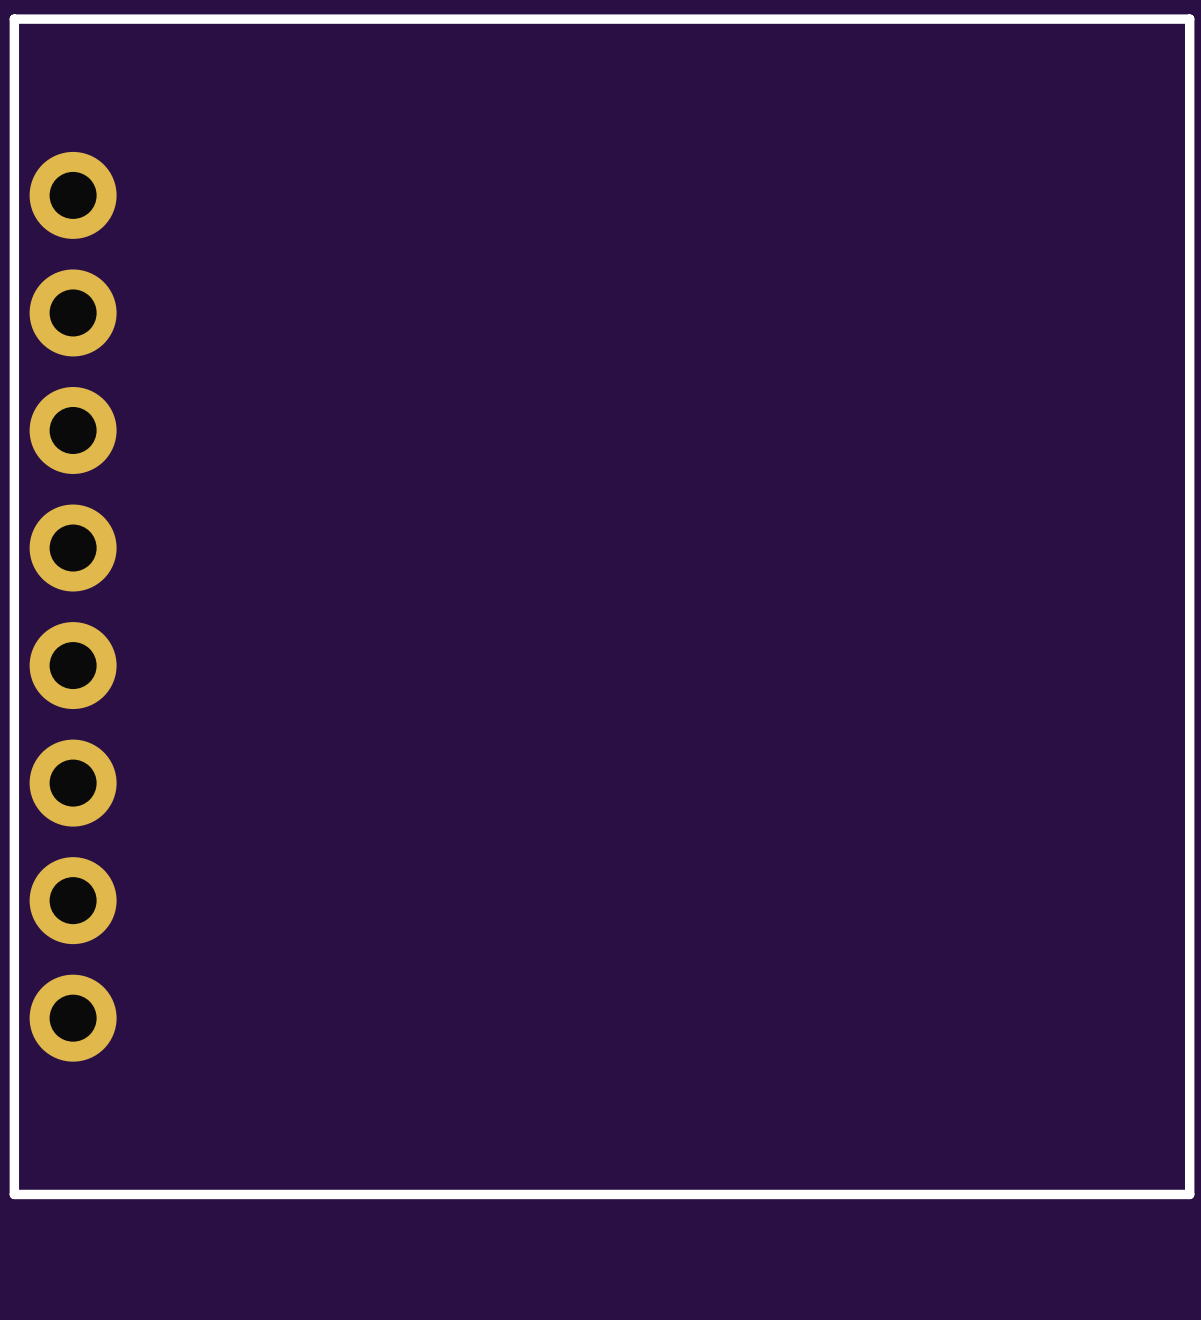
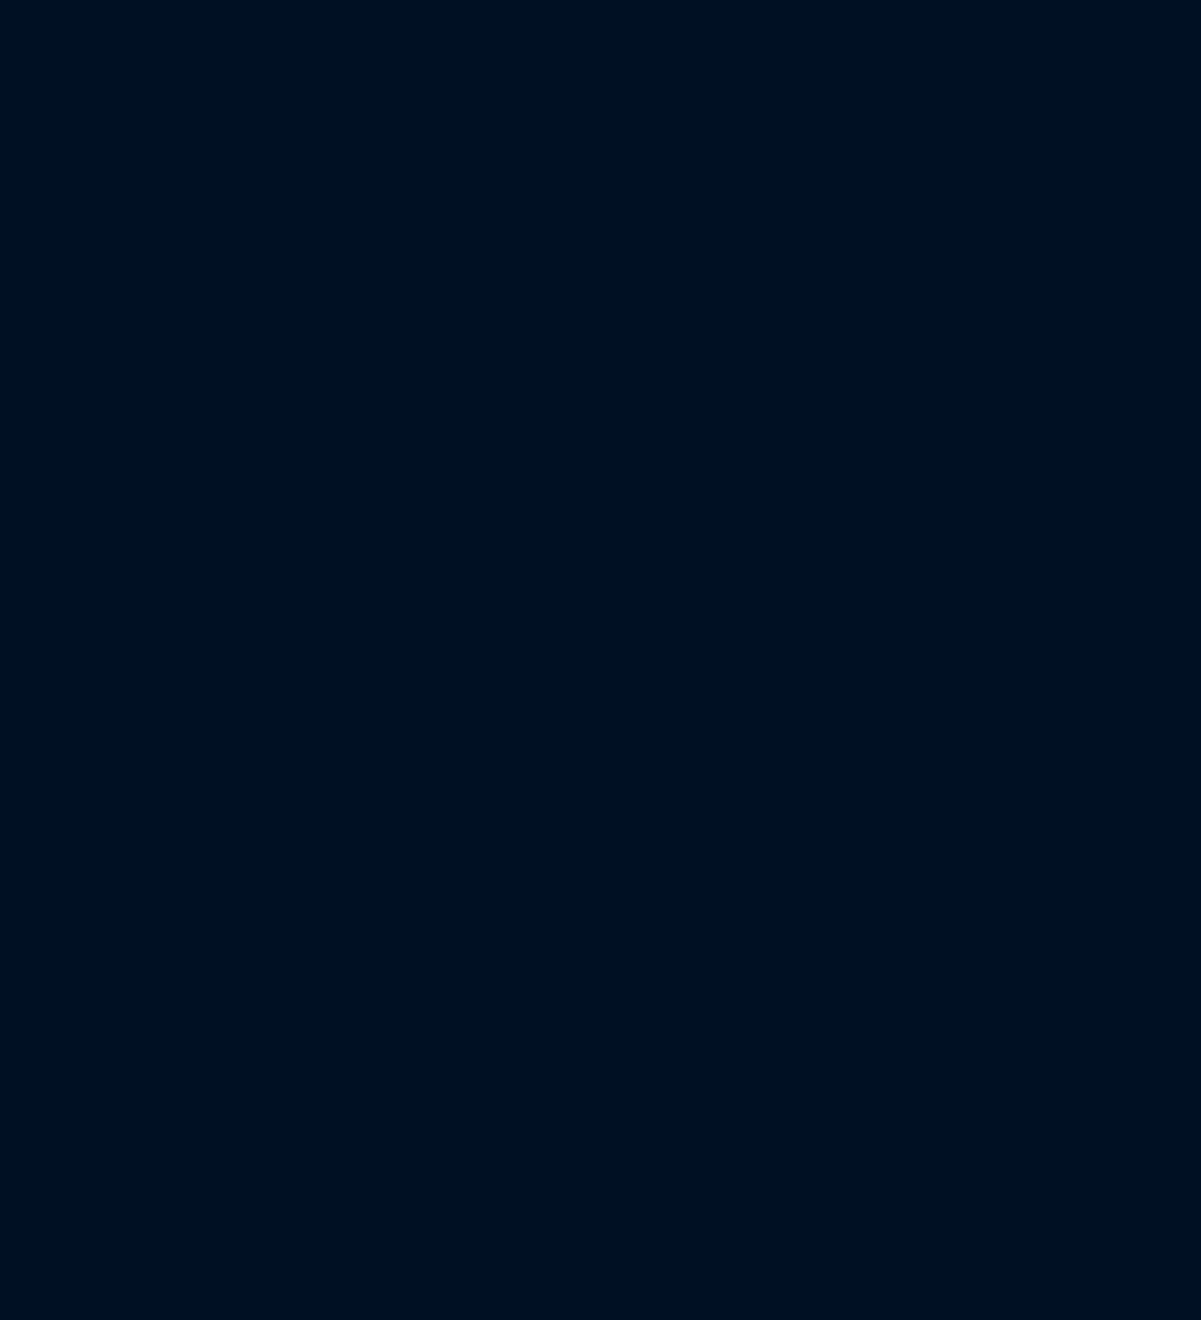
line: (14, 19) (14, 1194) (1189, 1194) (1189, 19) (14, 19) -> none
part: (73, 195) -> none
part: (73, 312) -> none
part: (73, 430) -> none
part: (73, 548) -> none
part: (73, 665) -> none
part: (73, 783) -> none
part: (73, 900) -> none
part: (73, 1018) -> none

